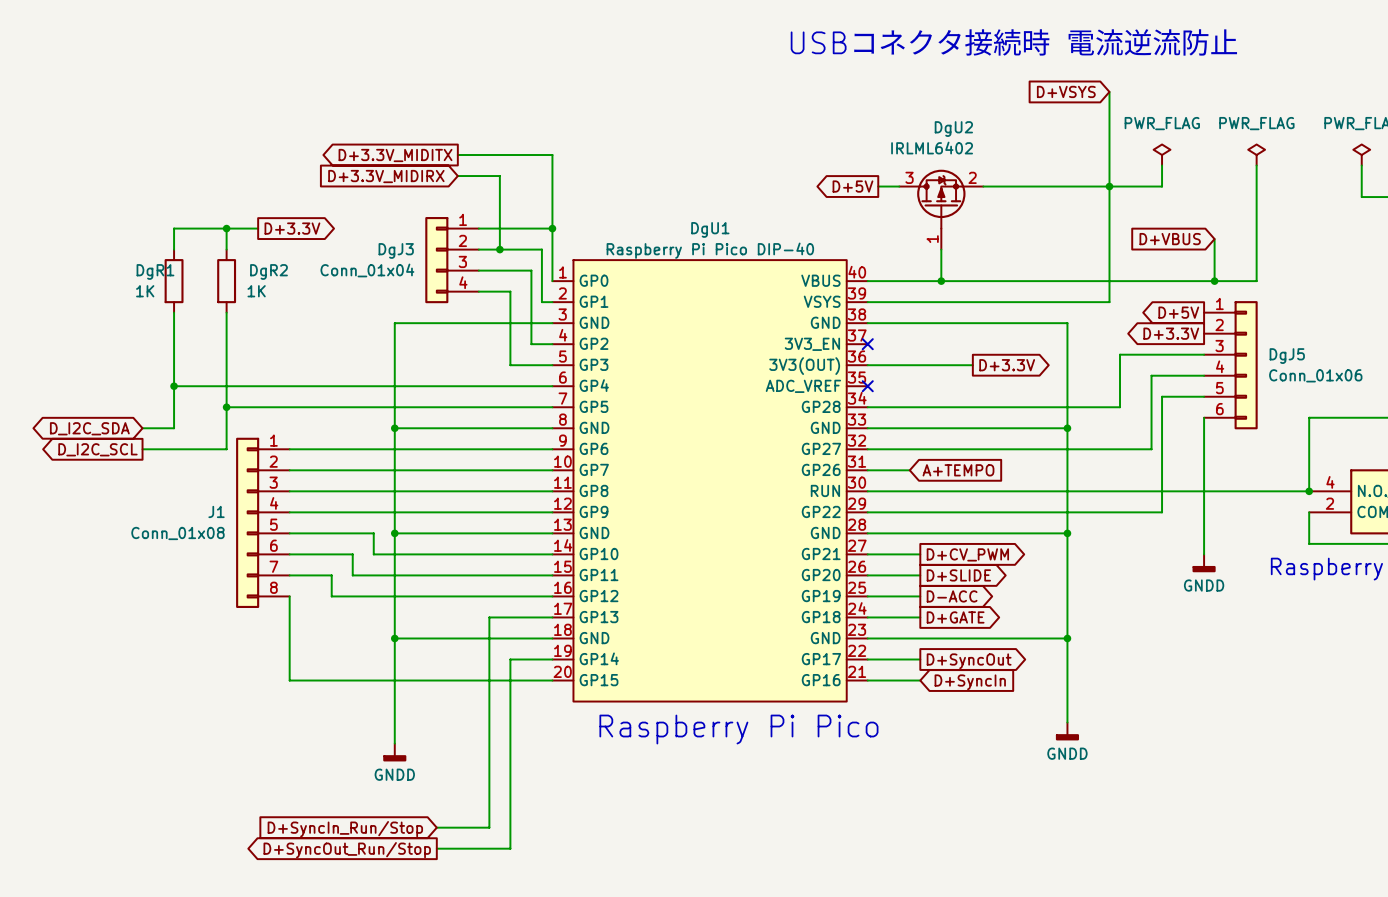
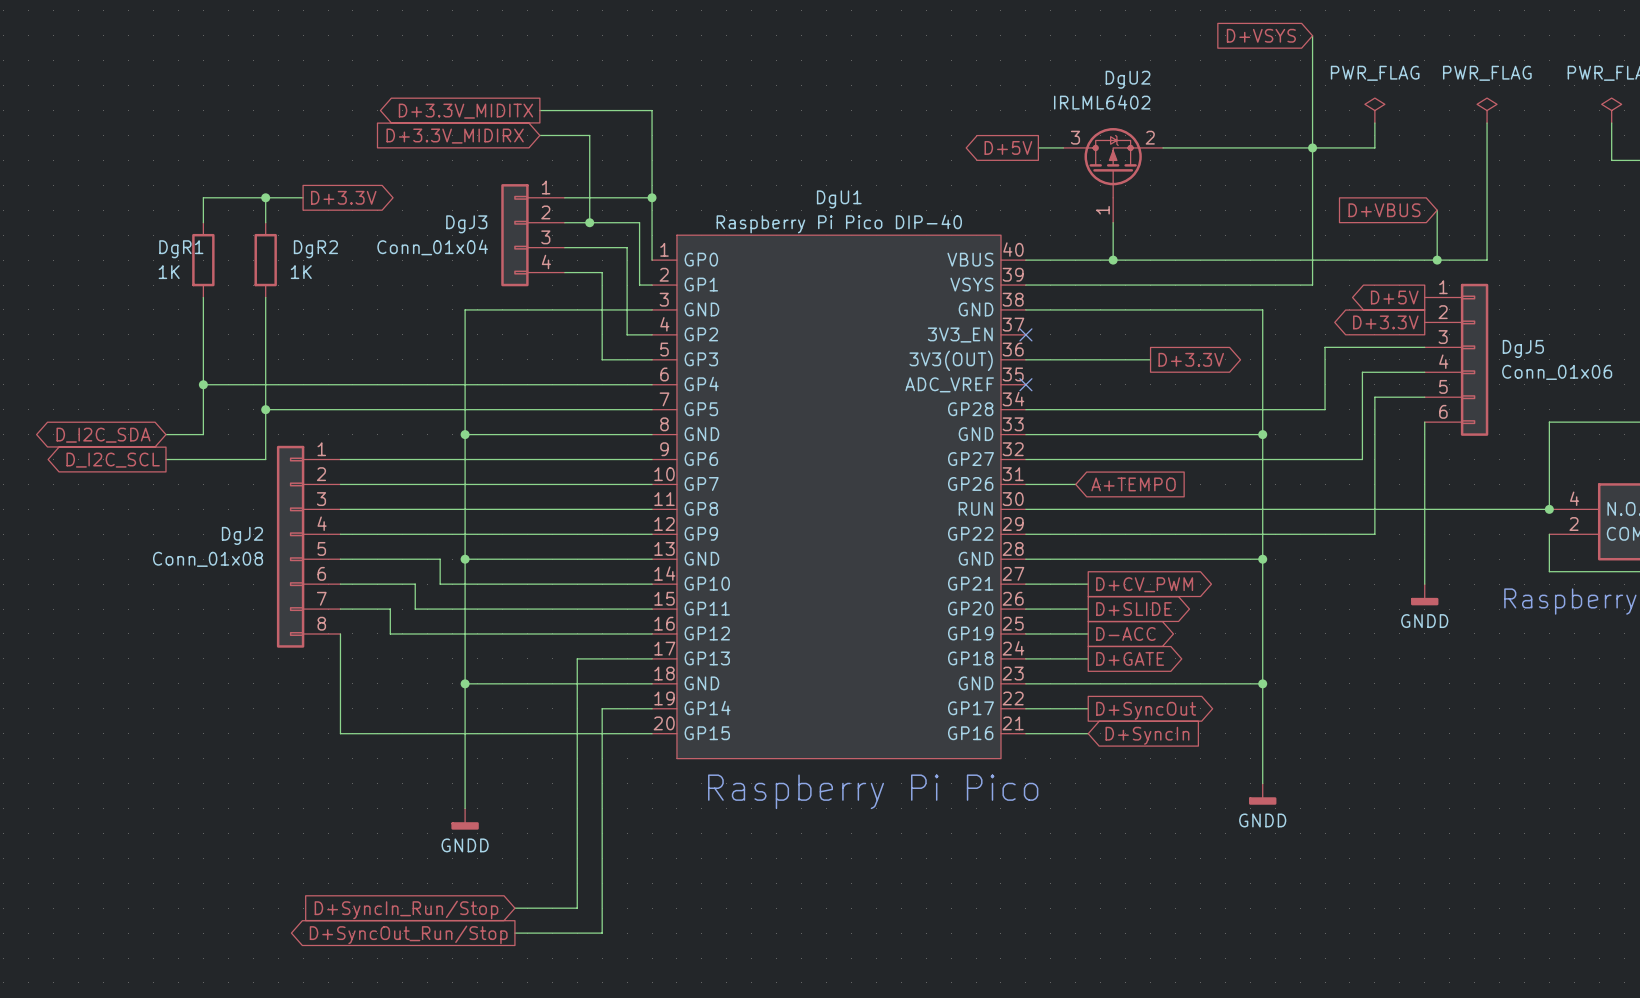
J1 name: J1 (216, 511) -> DgJ2 (242, 535)

